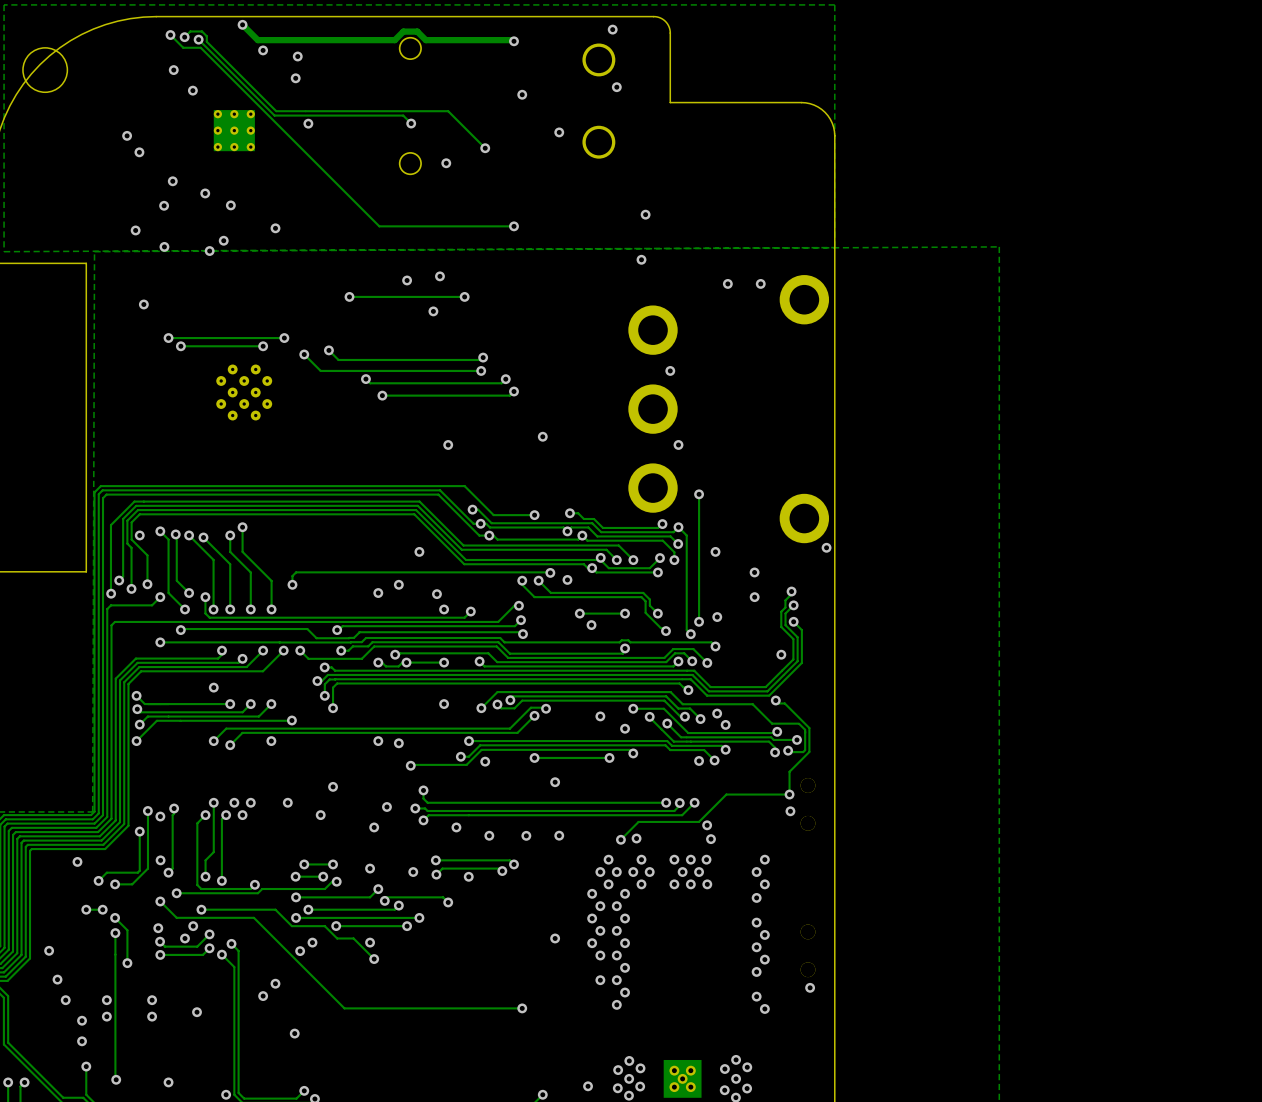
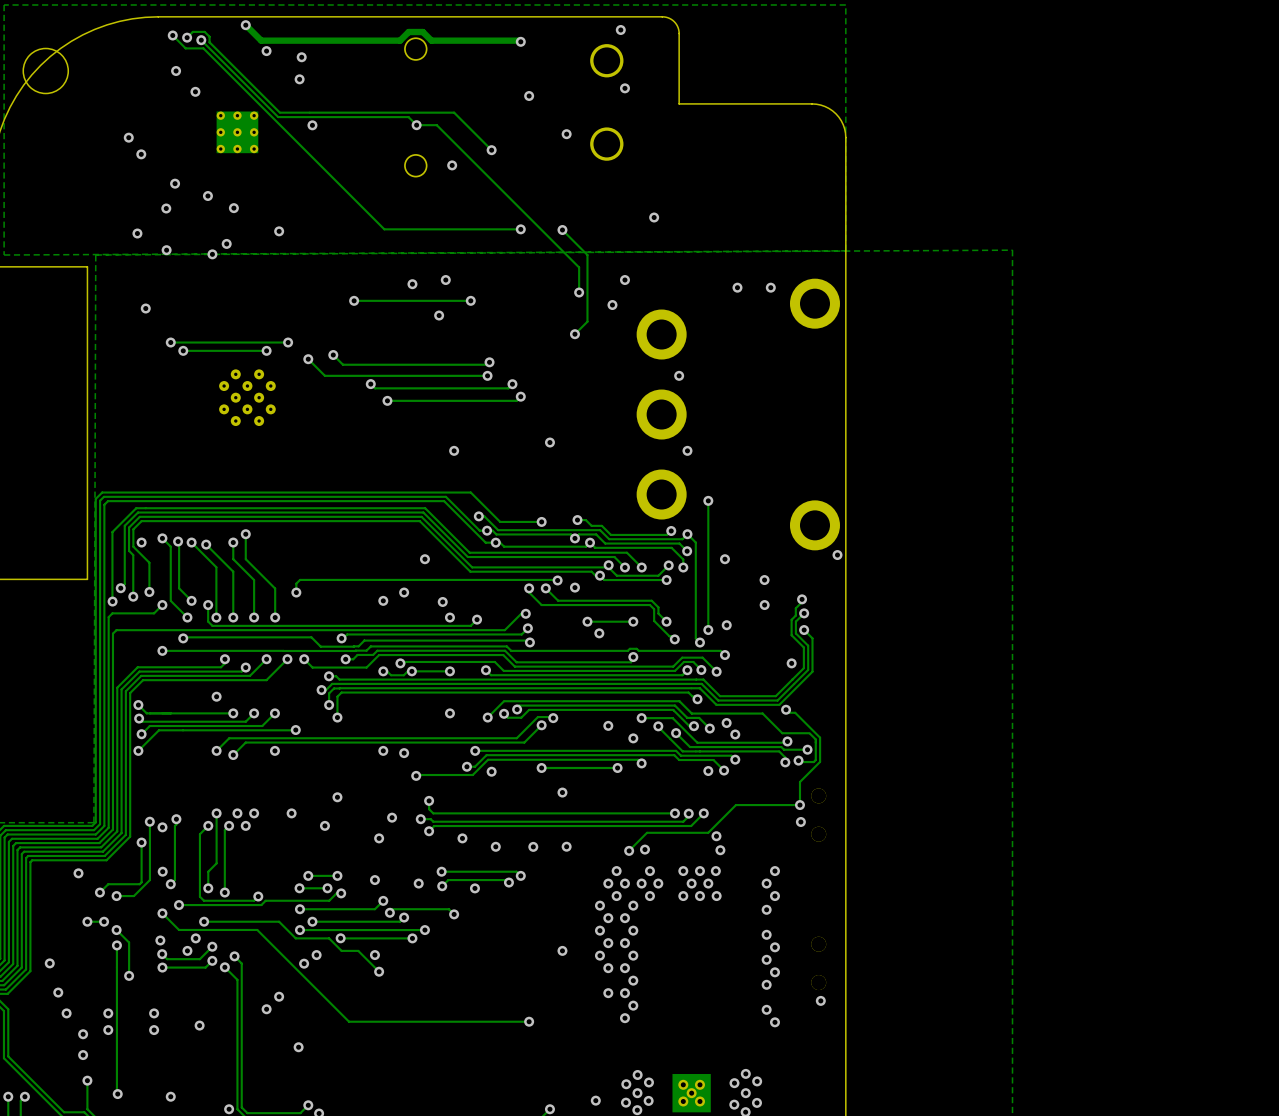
track: none -> (416, 125) (436, 125) (579, 267) (579, 292)
track: none -> (562, 230) (587, 255) (587, 321) (574, 334)
via: none -> (562, 230)
via: (641, 259) -> none
via: none -> (624, 280)
via: none -> (579, 292)
via: none -> (612, 305)
via: none -> (574, 334)

